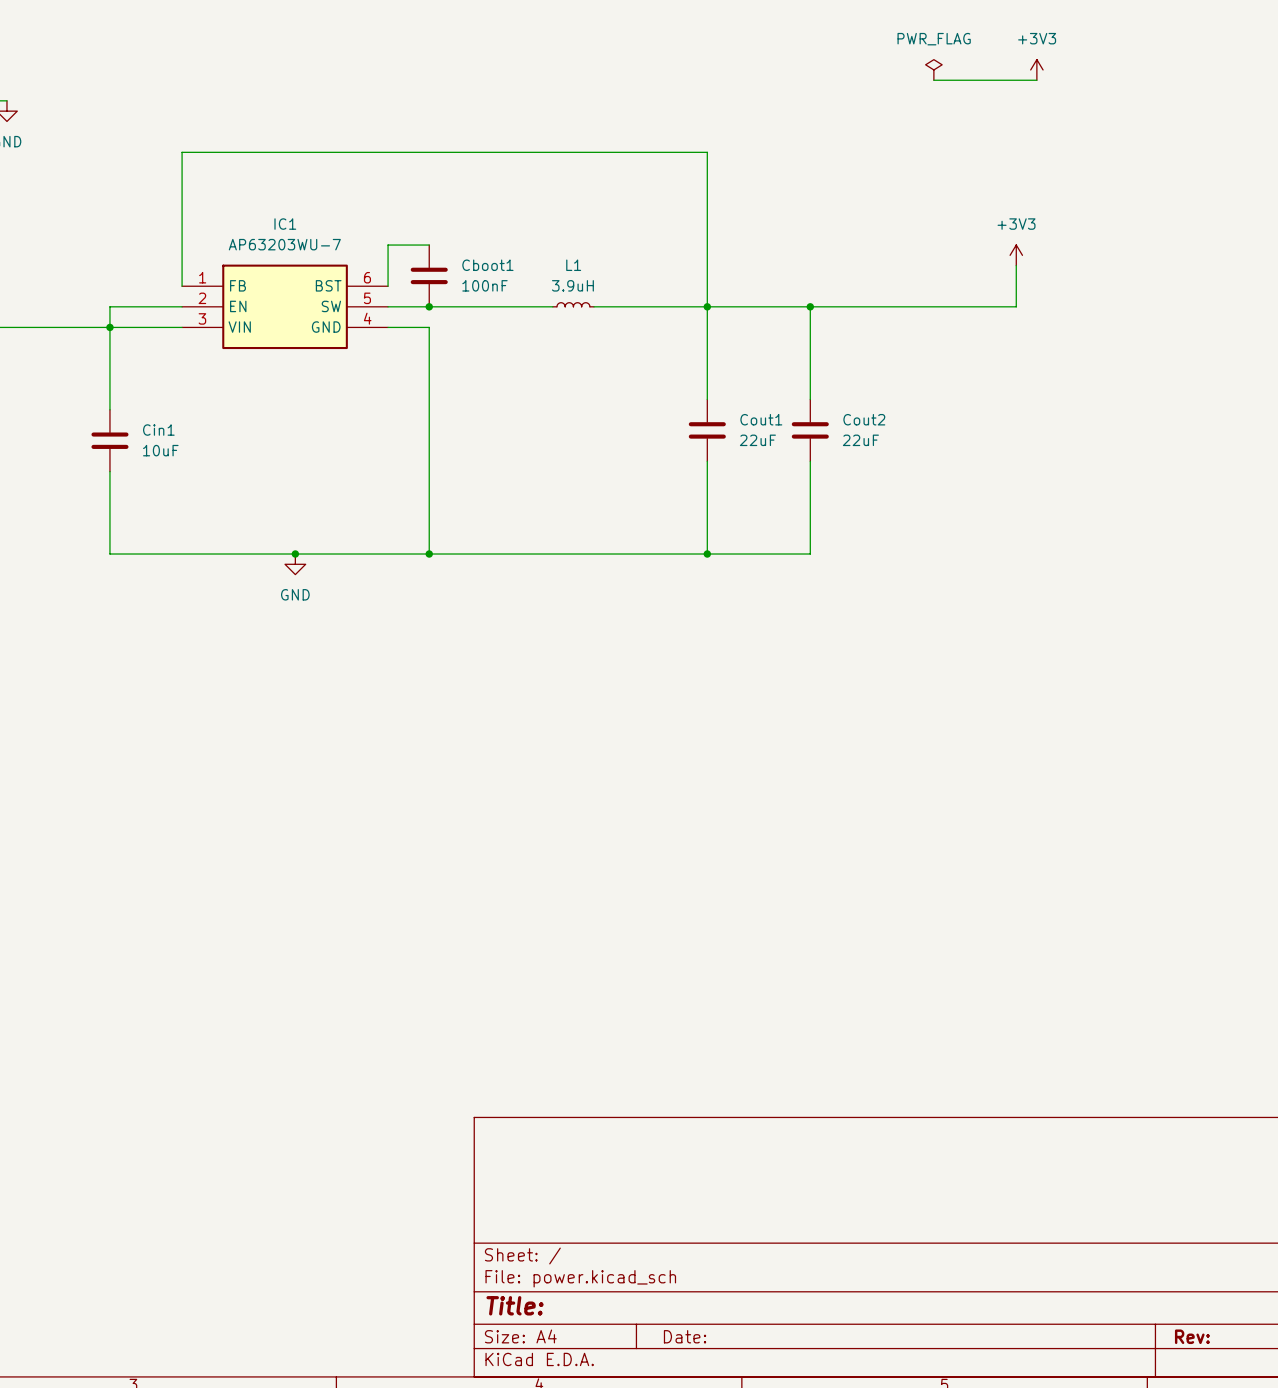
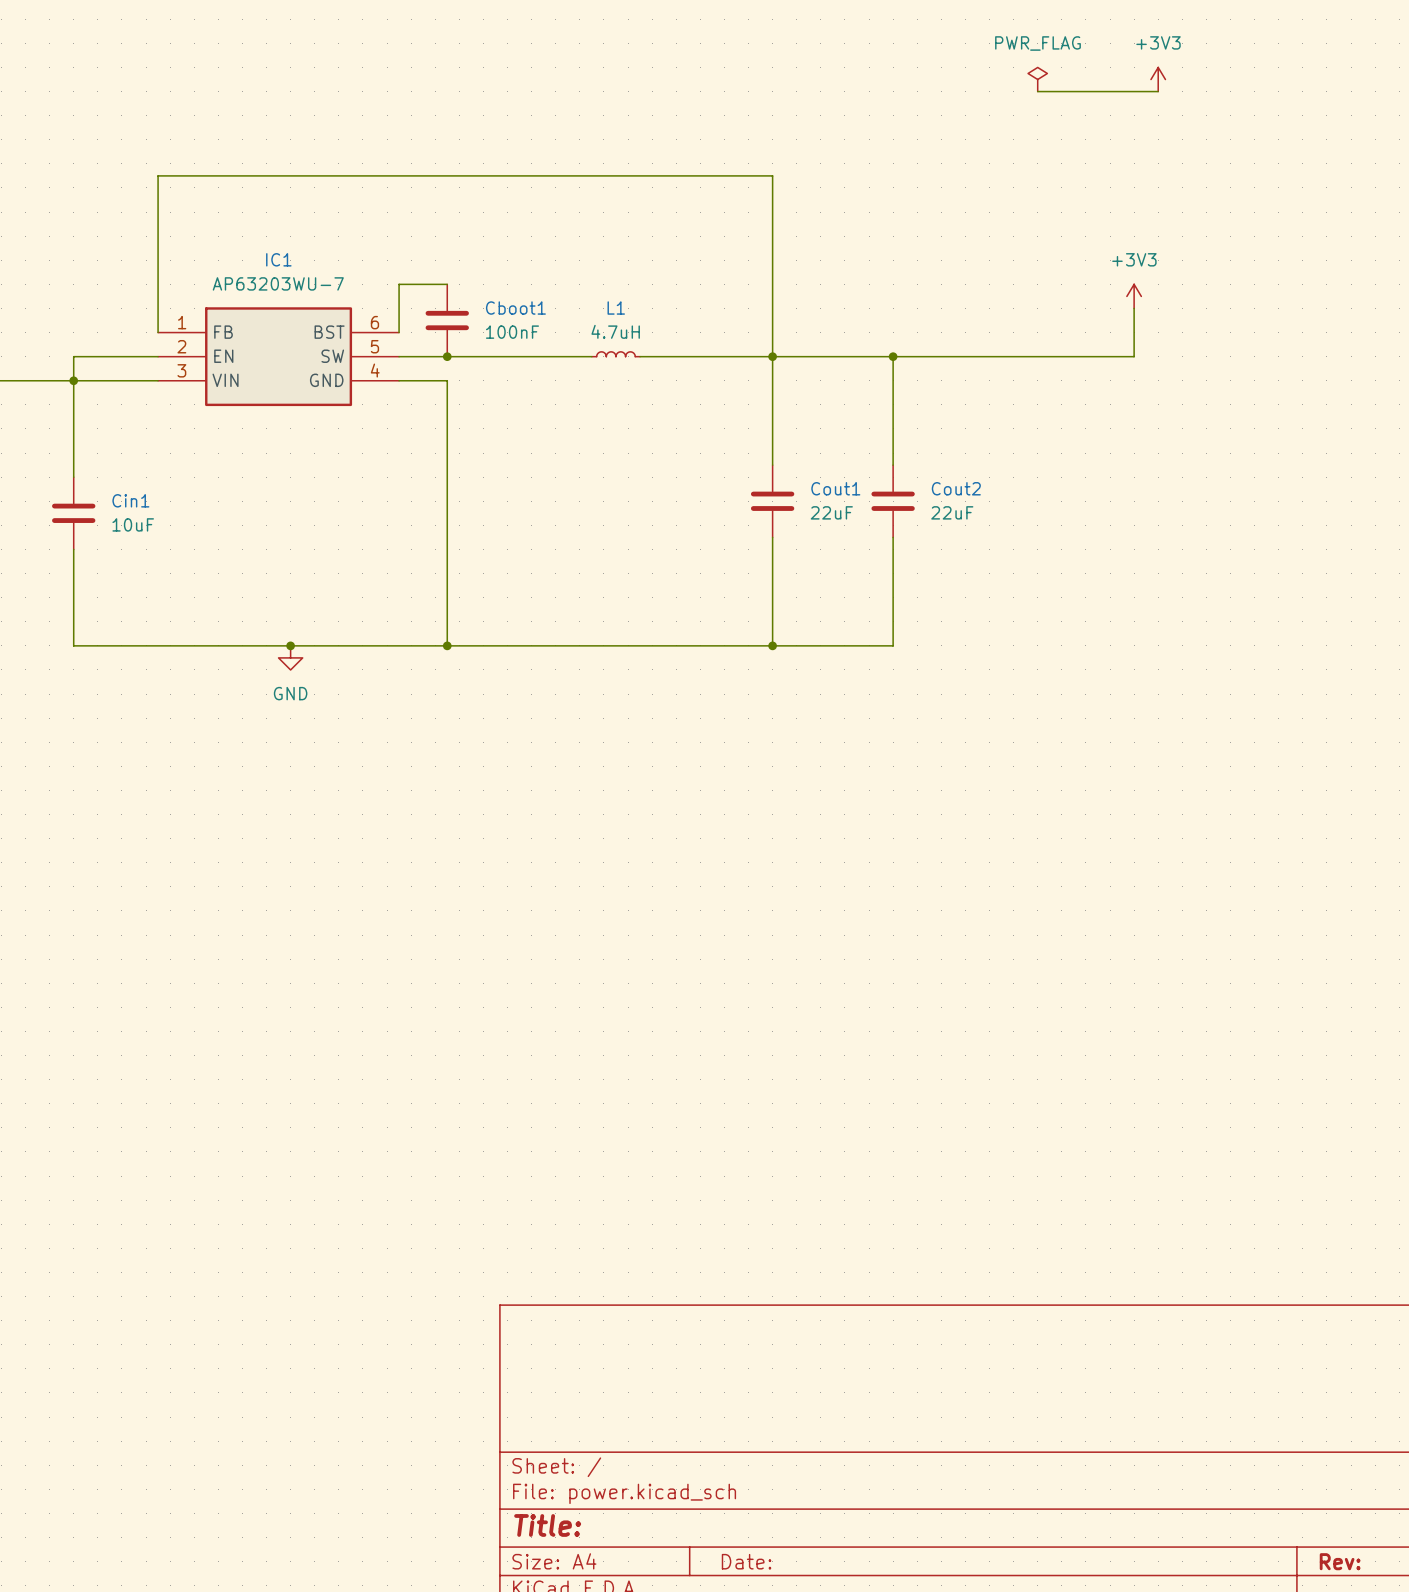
L1 value: 3.9uH (572, 285) -> 4.7uH (615, 331)

